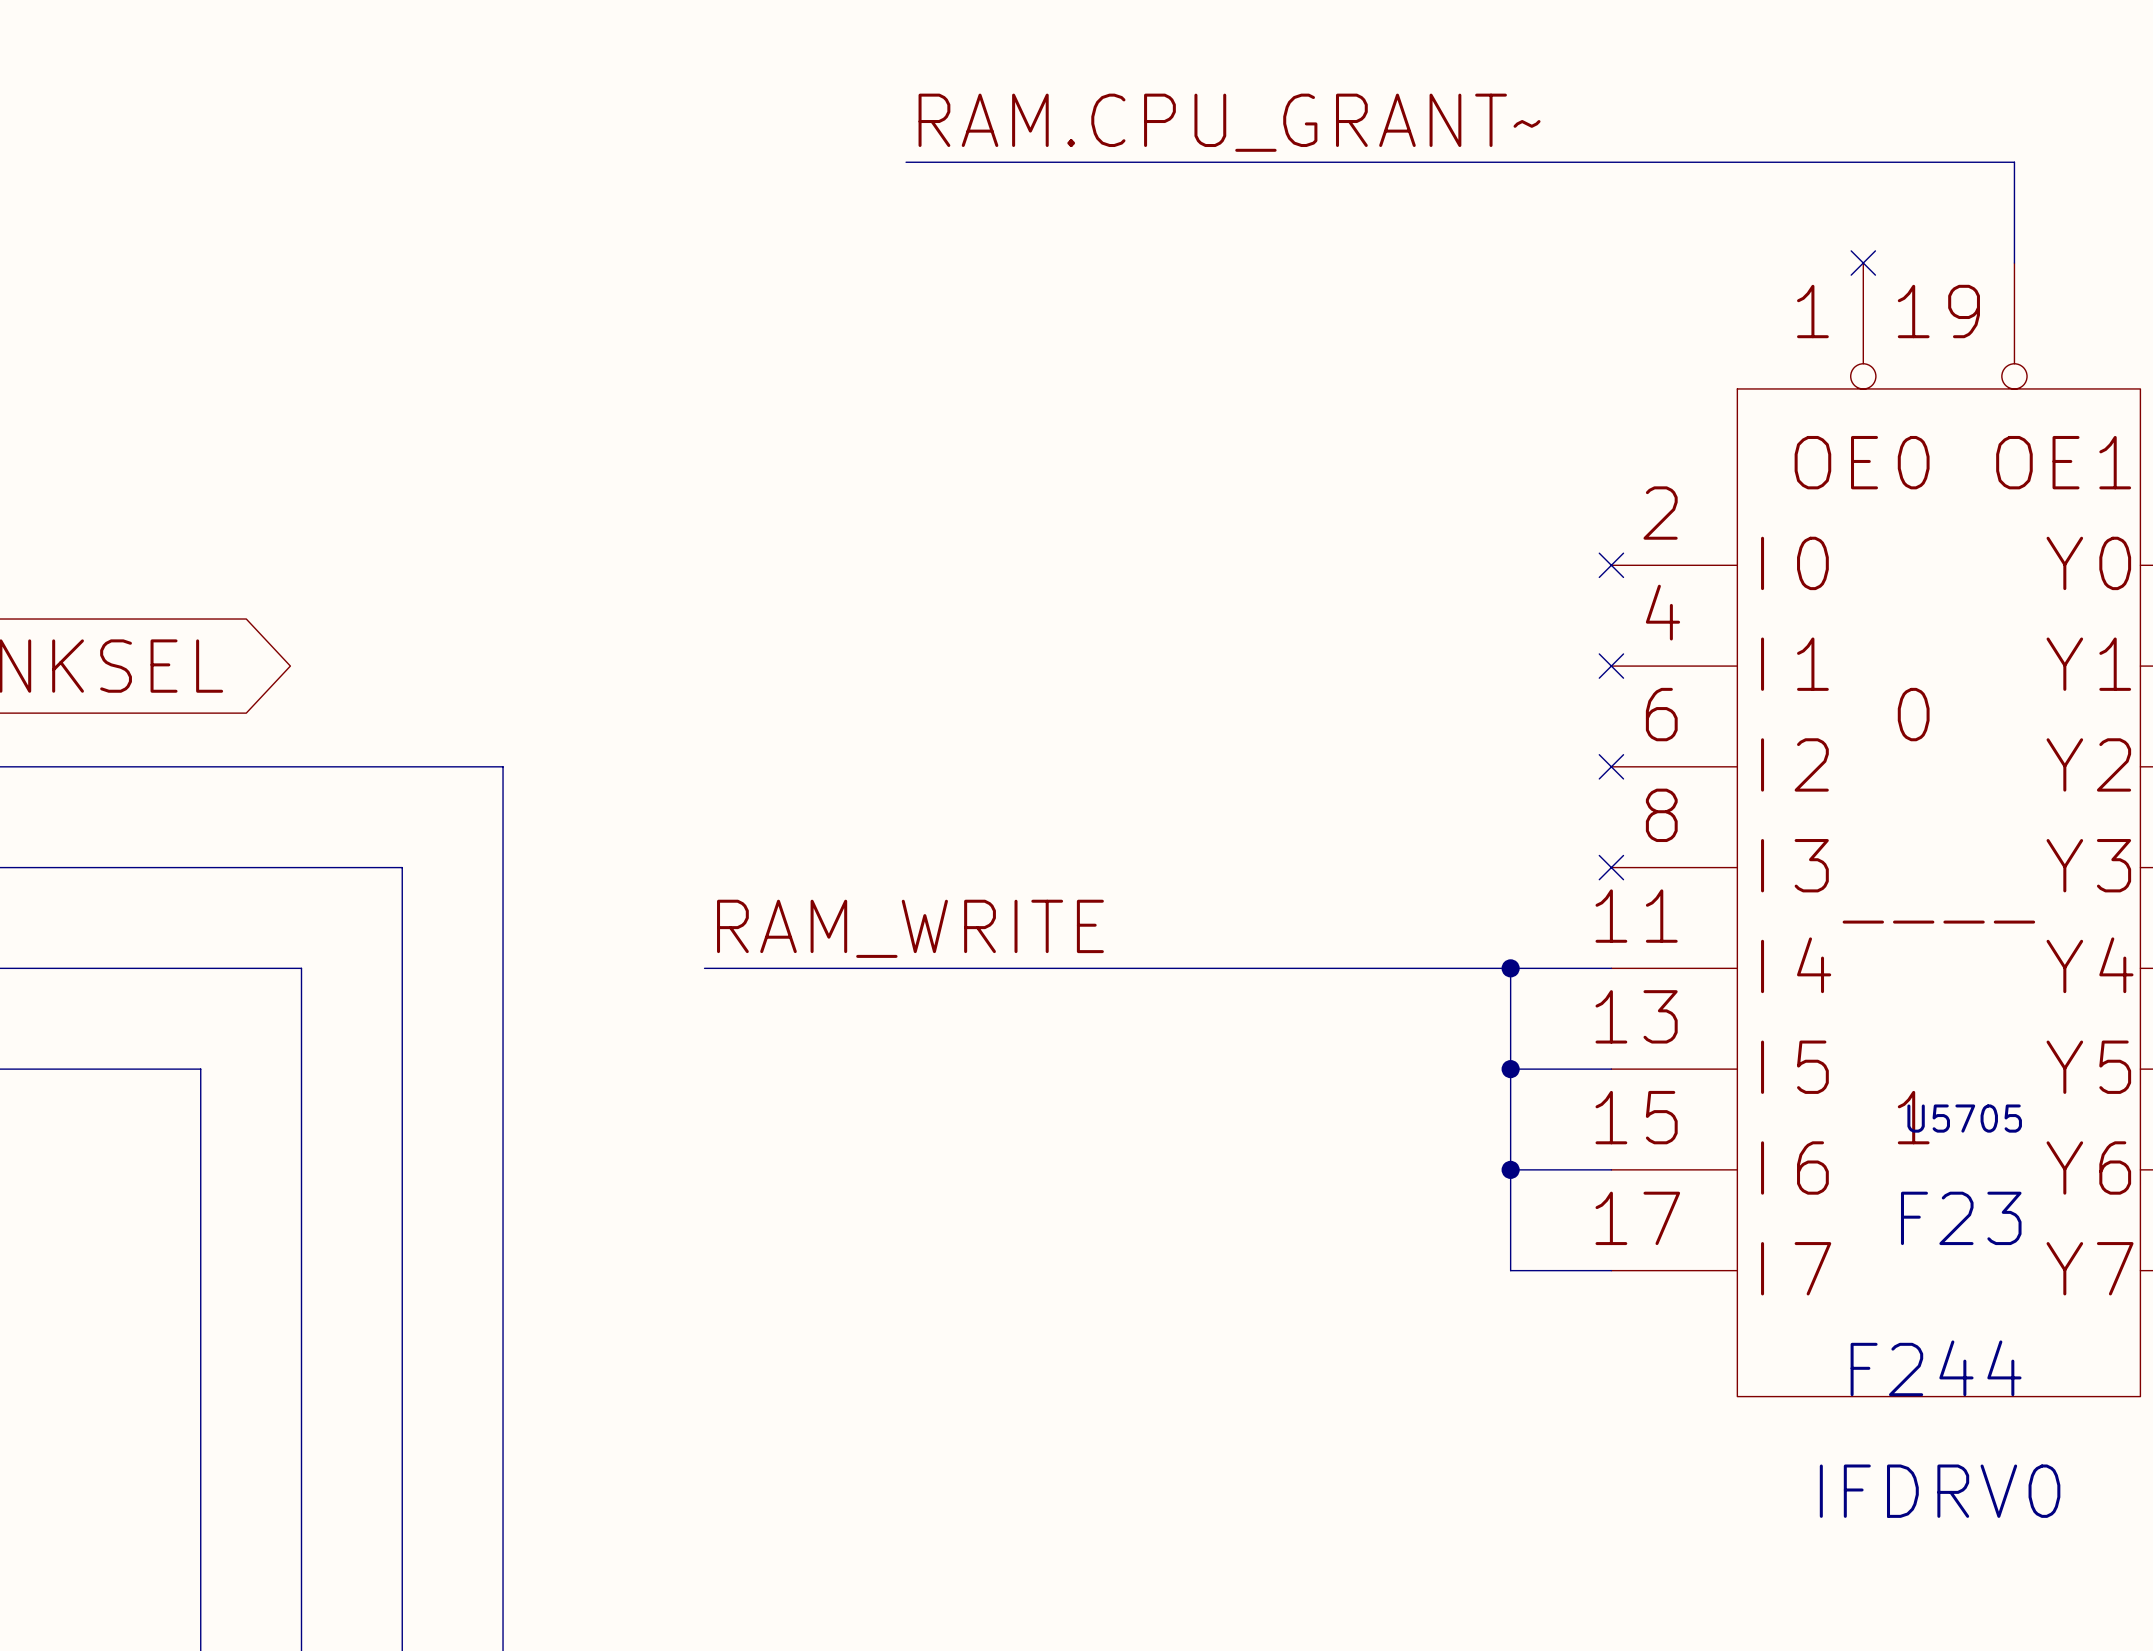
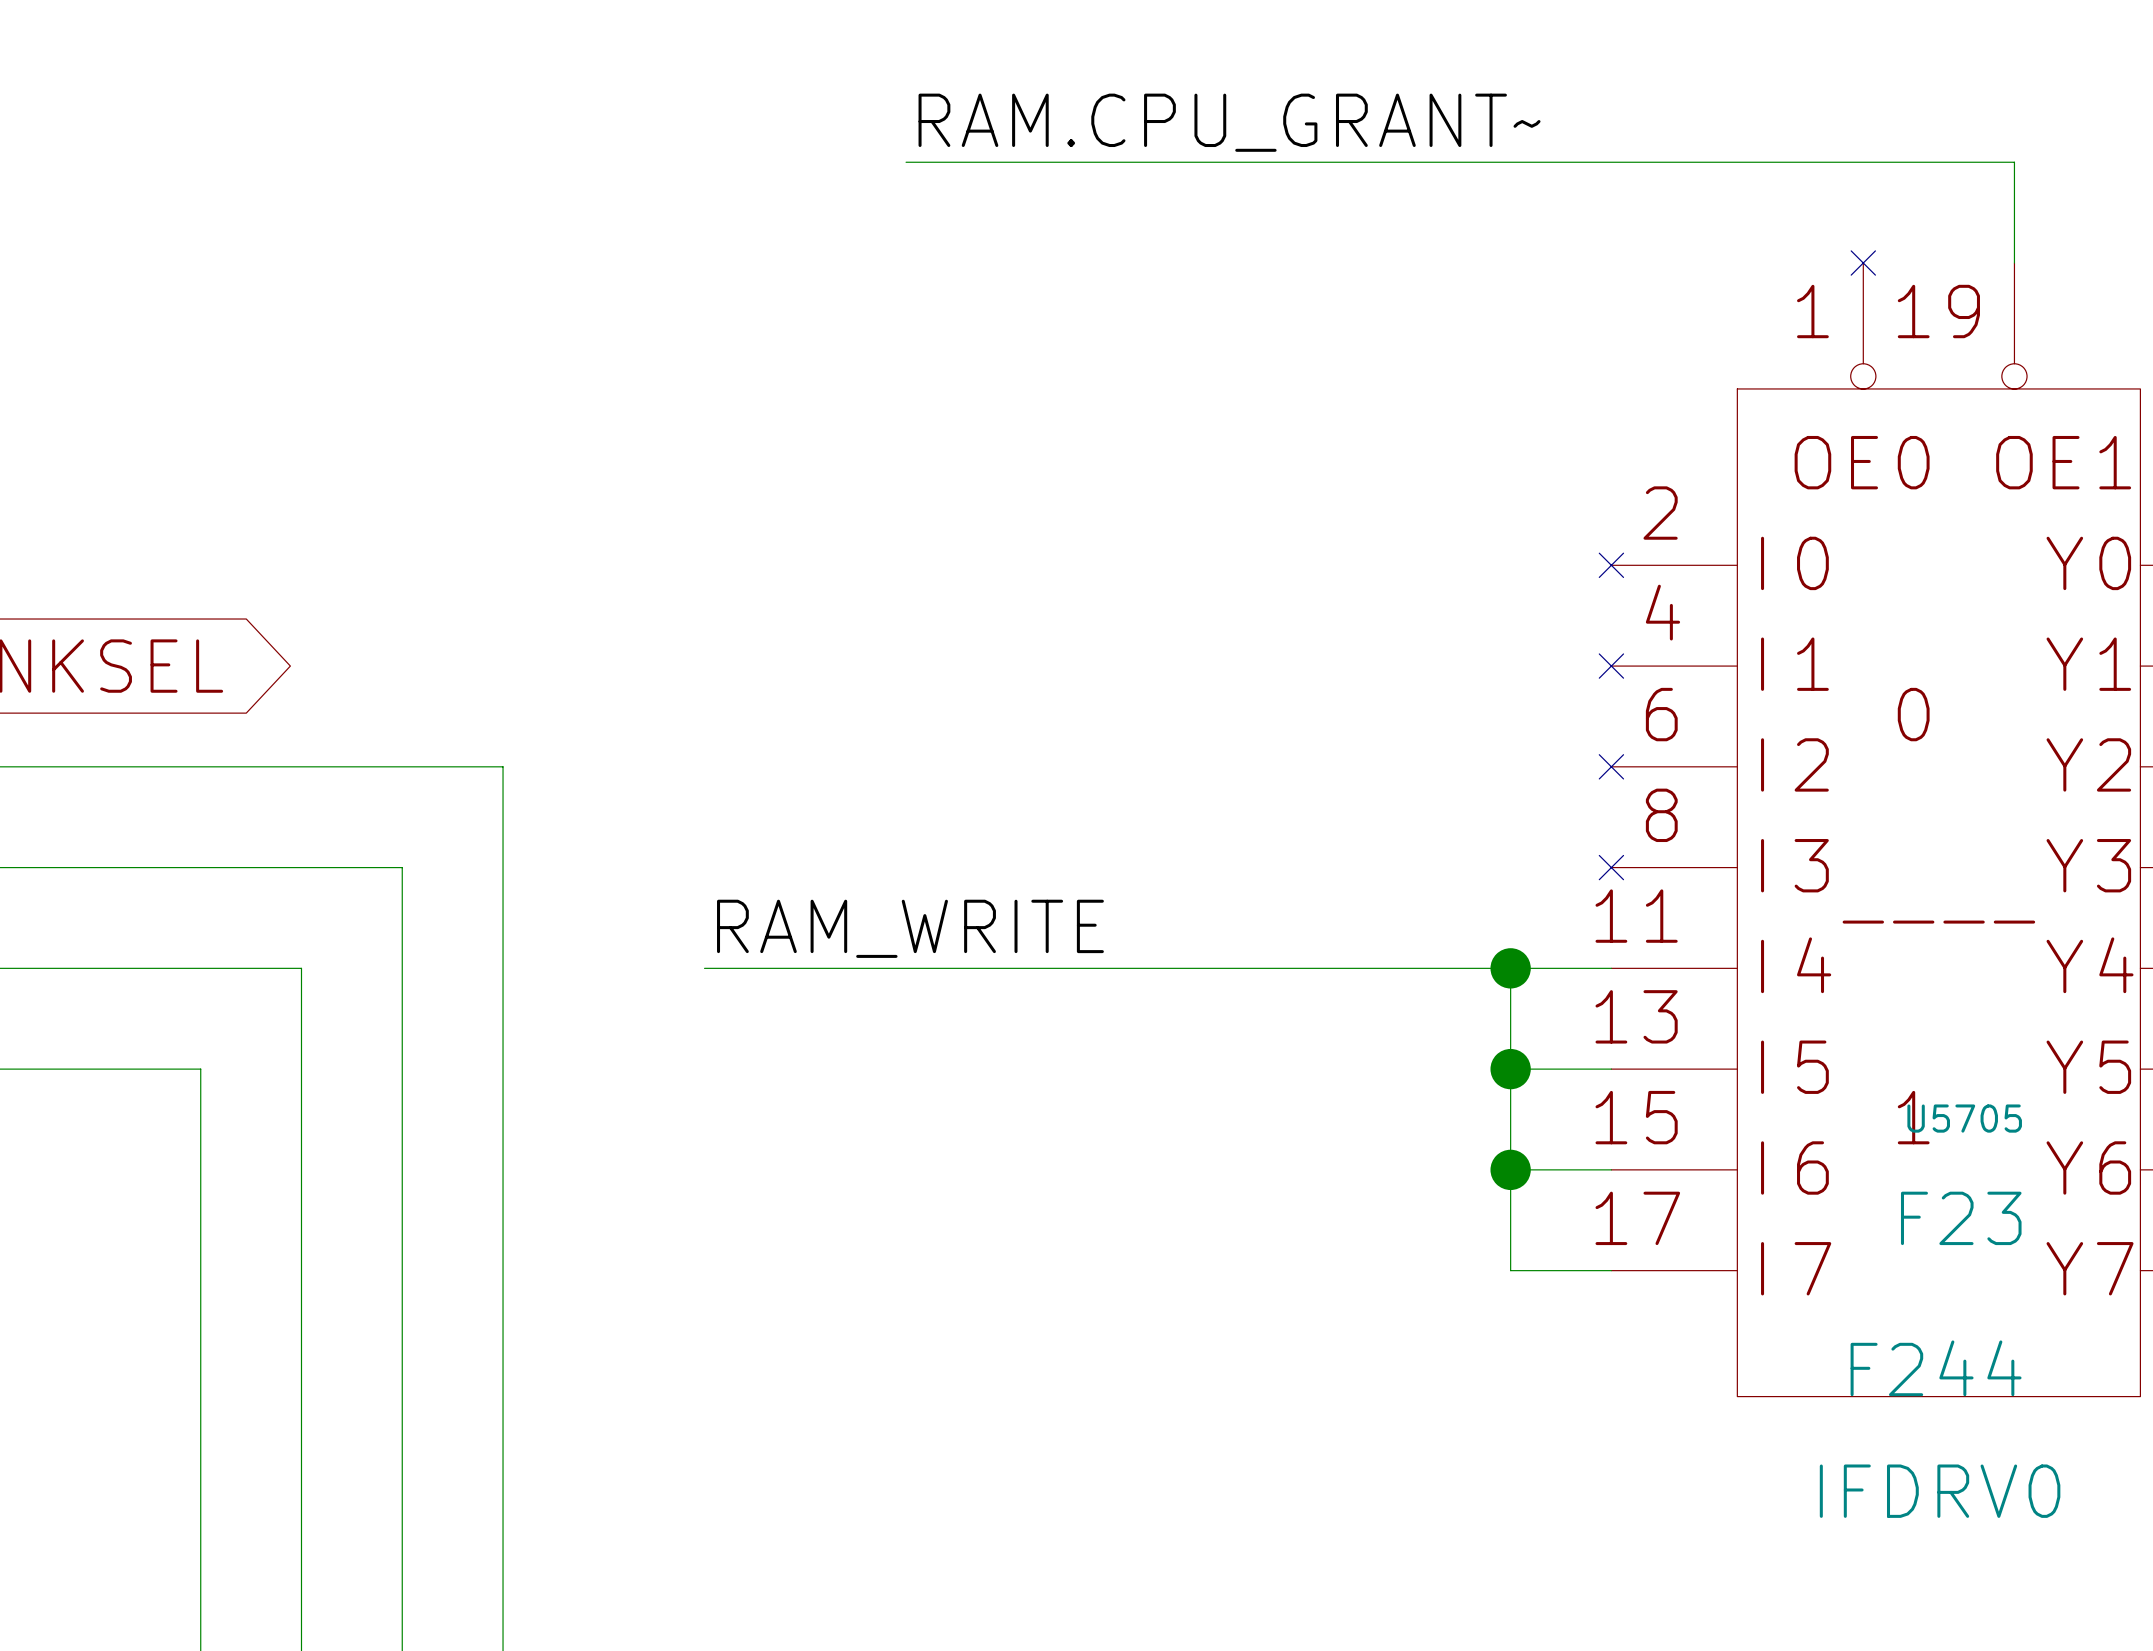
junction size: [1501, 959, 1520, 978] -> [1490, 948, 1531, 989]
junction size: [1501, 1060, 1520, 1079] -> [1490, 1048, 1531, 1090]
junction size: [1501, 1160, 1520, 1179] -> [1490, 1149, 1531, 1191]

